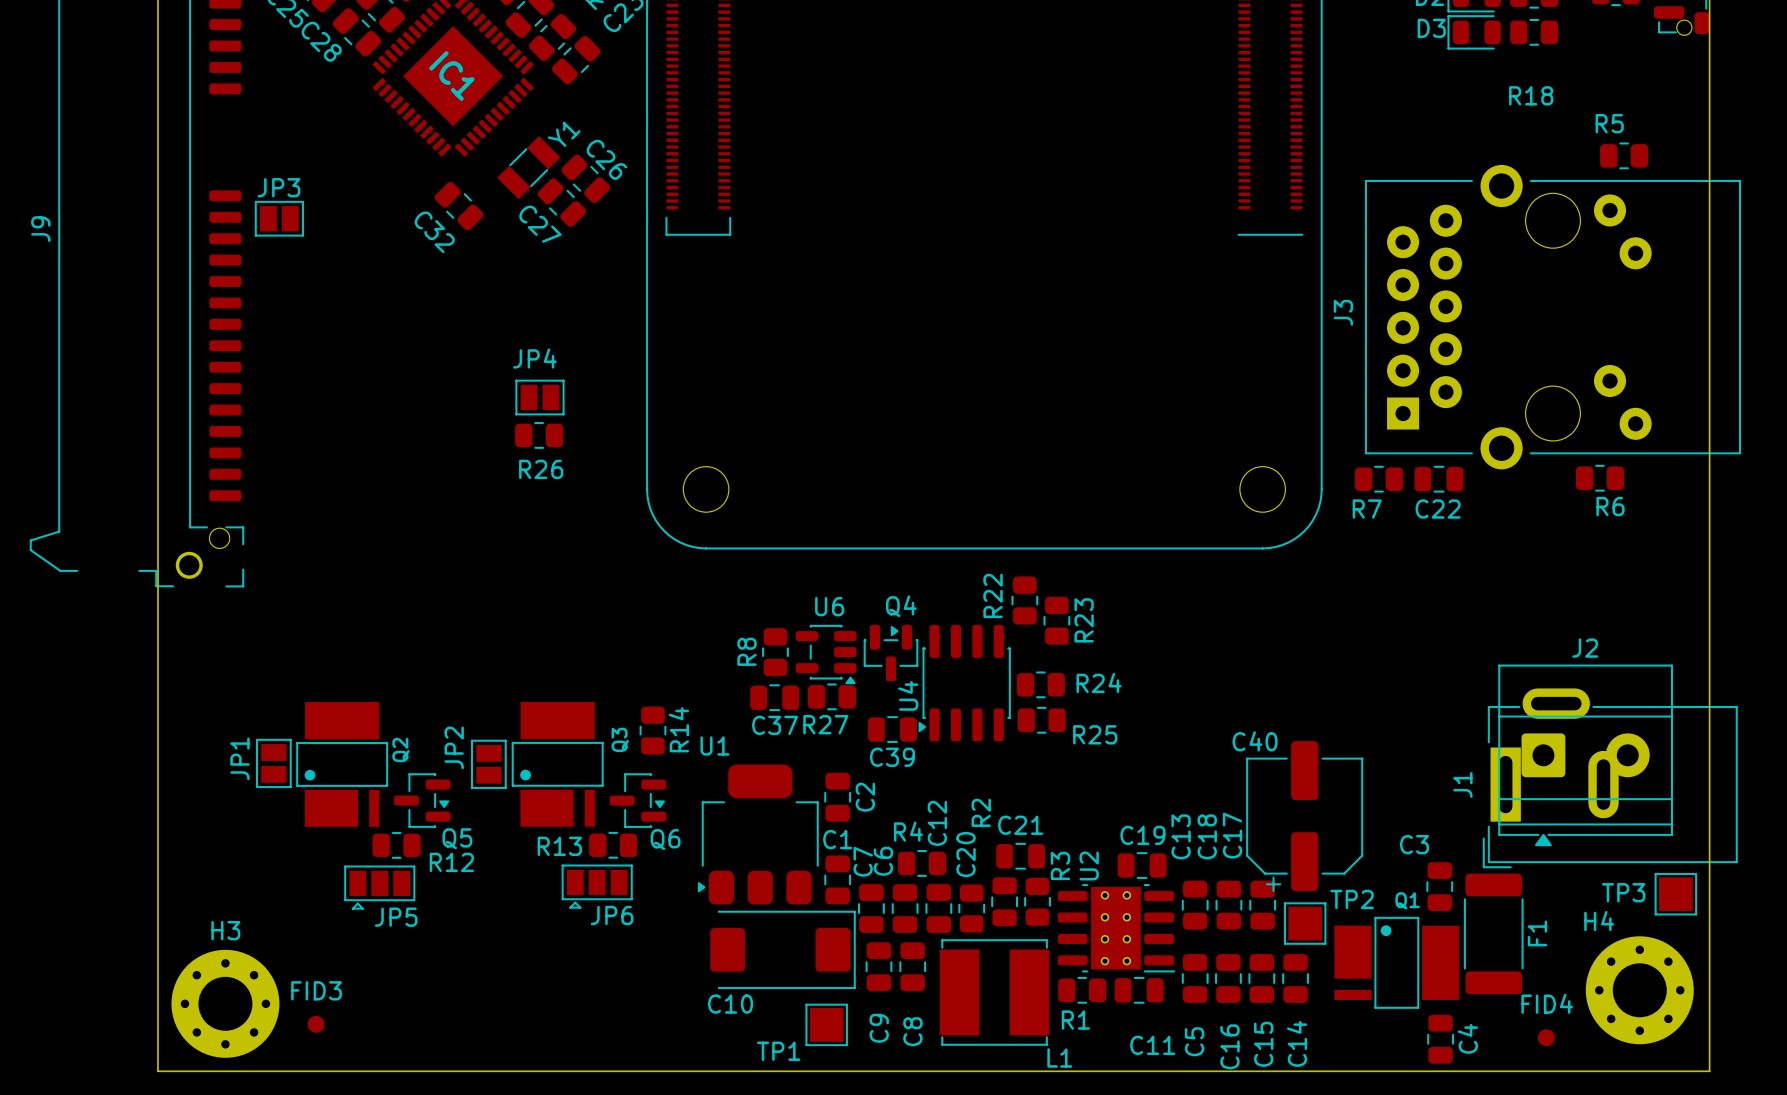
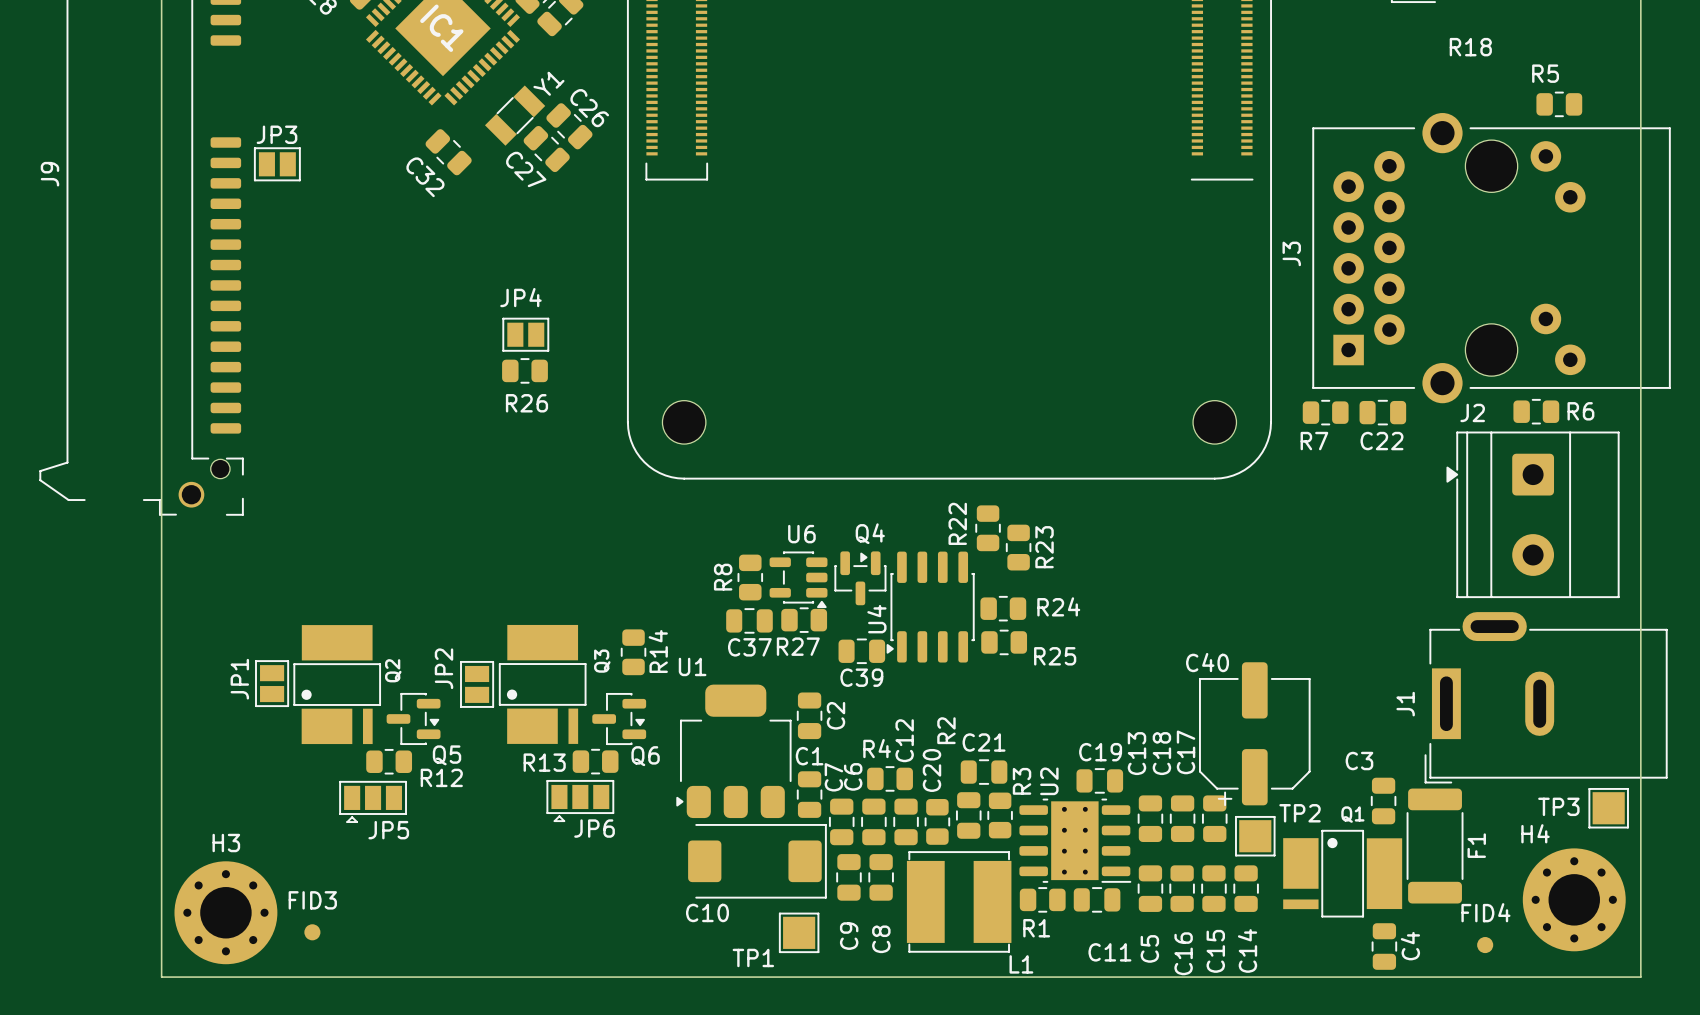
R6 name position: R6 (1610, 506) -> R6 (1580, 411)
J2 name position: J2 (1585, 648) -> J2 (1472, 412)
J2 rotation: 0° (1585, 755) -> 90° clockwise (1533, 514)
J2 position: (1585, 755) -> (1533, 514)

